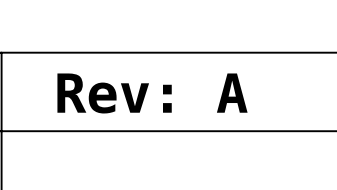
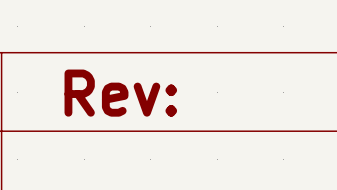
title block: Rev: A (152, 93) -> Rev: (120, 93)

